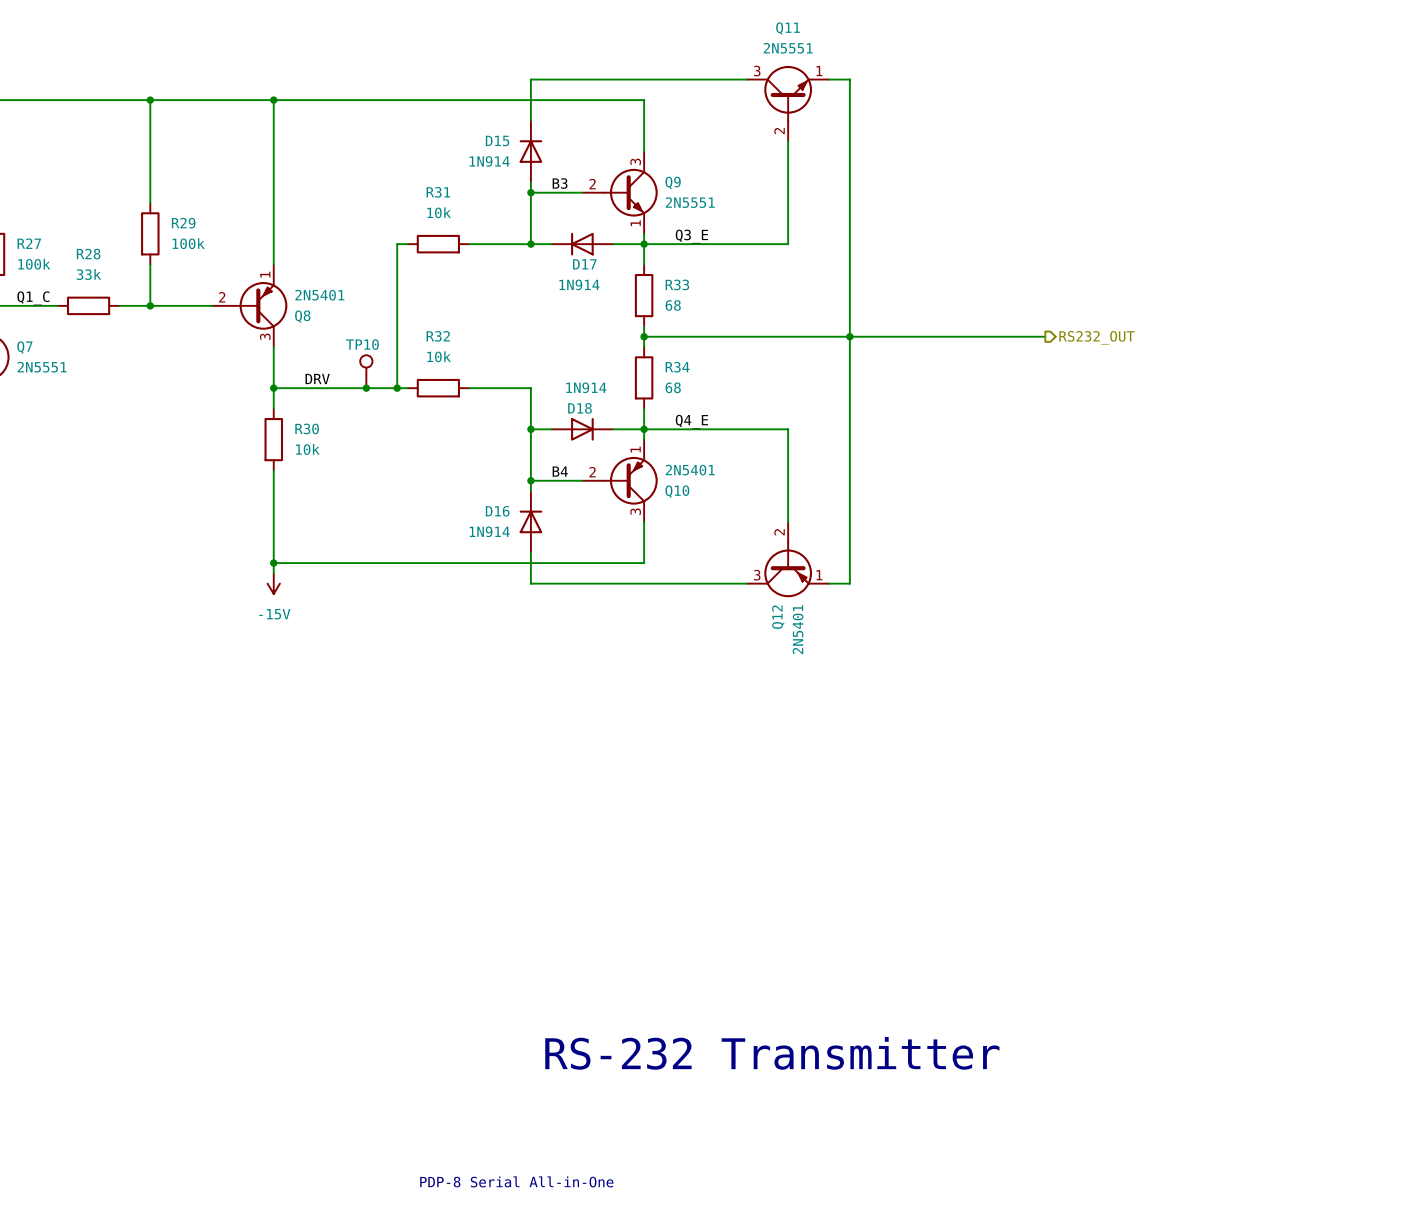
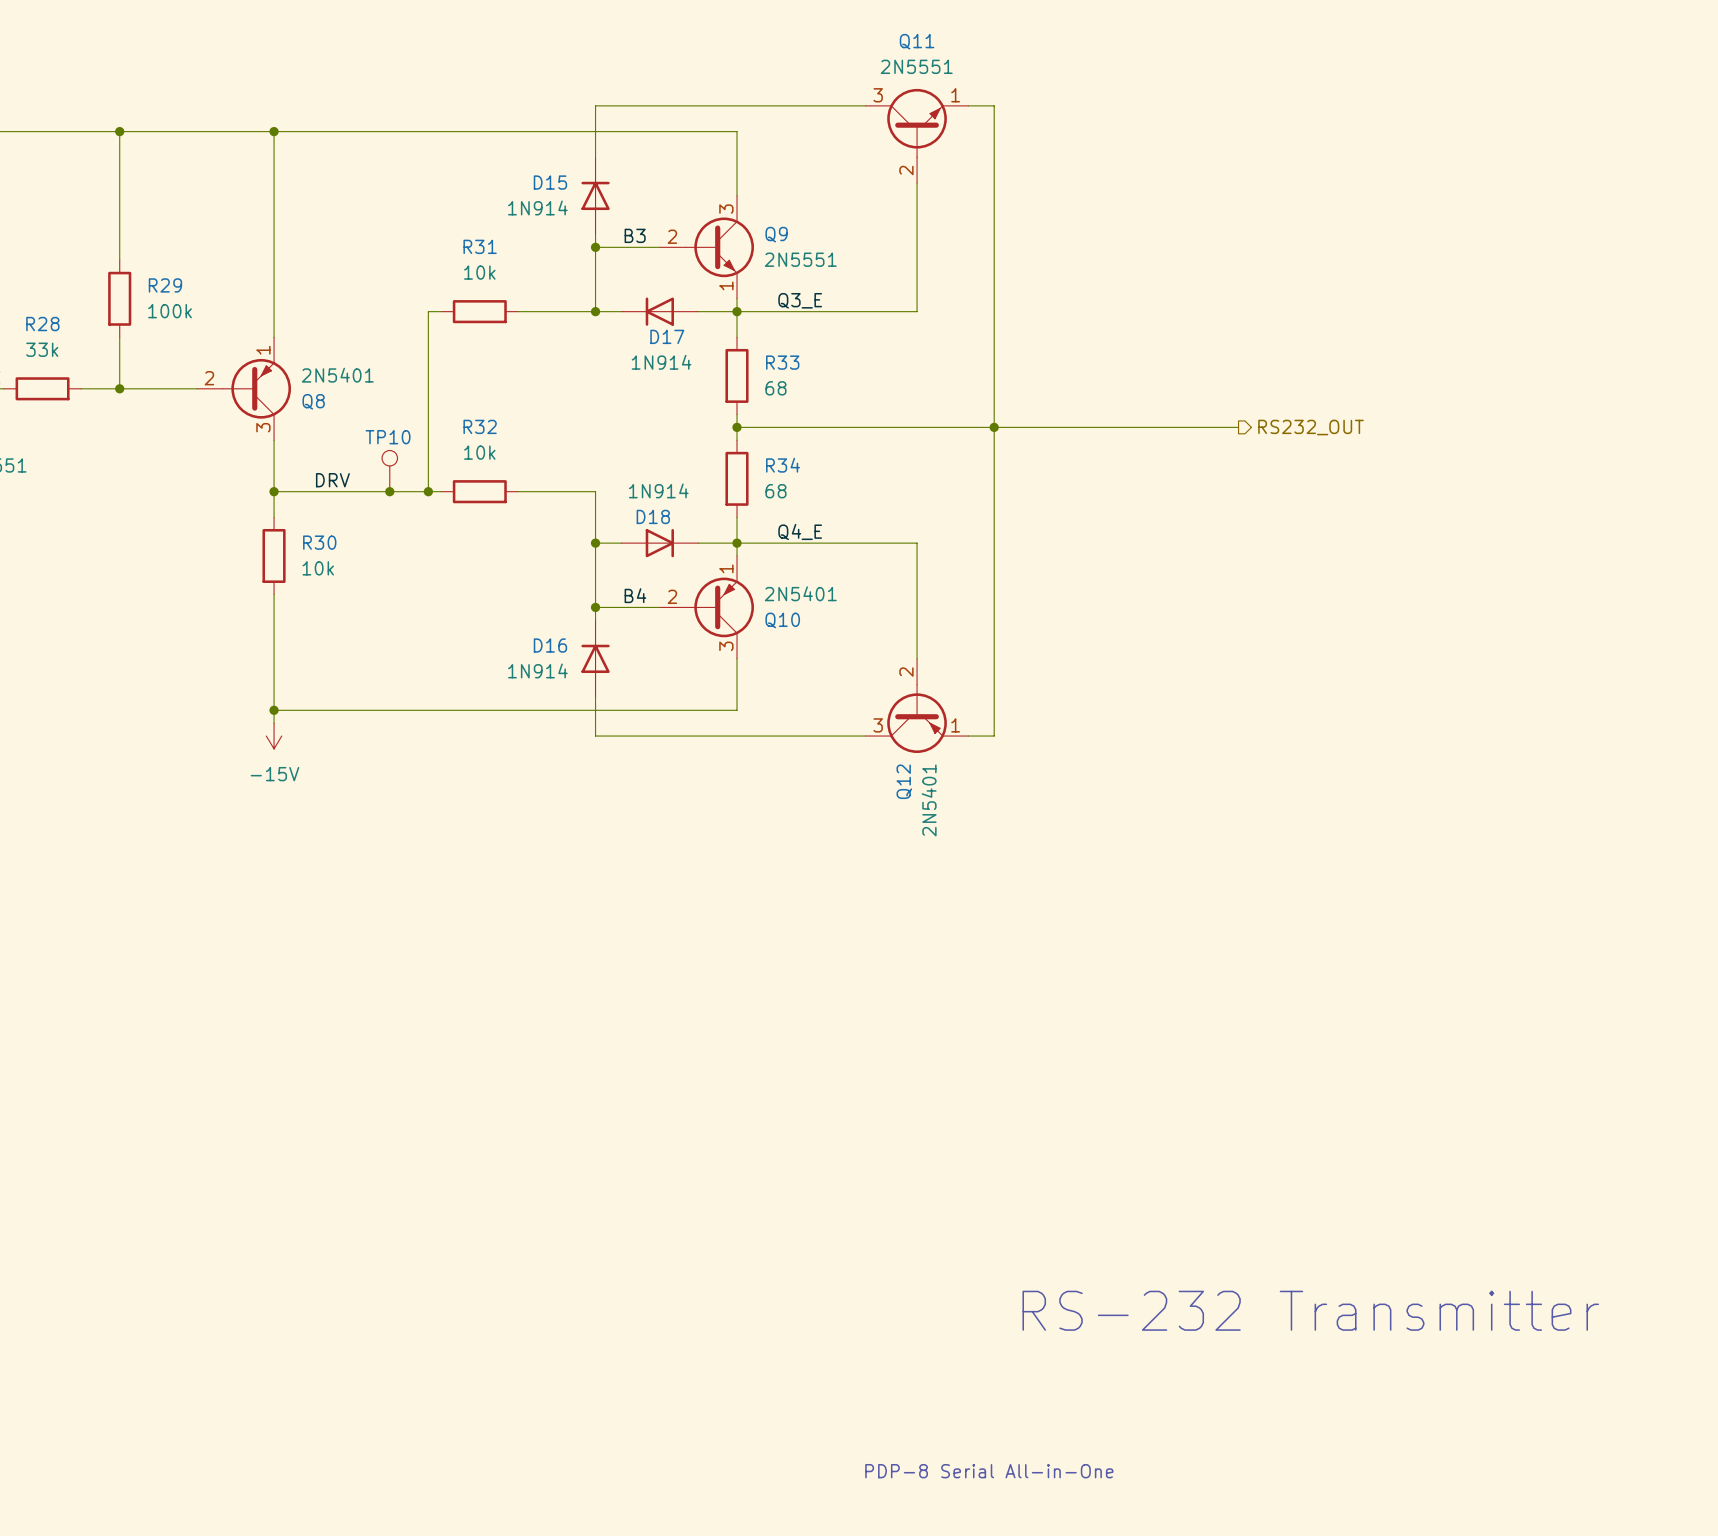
text: none -> RS-232 Transmitter (1310, 1310)
text: RS-232 Transmitter (772, 1053) -> none
text: none -> PDP-8 Serial All-in-One (989, 1471)
text: PDP-8 Serial All-in-One (516, 1181) -> none

